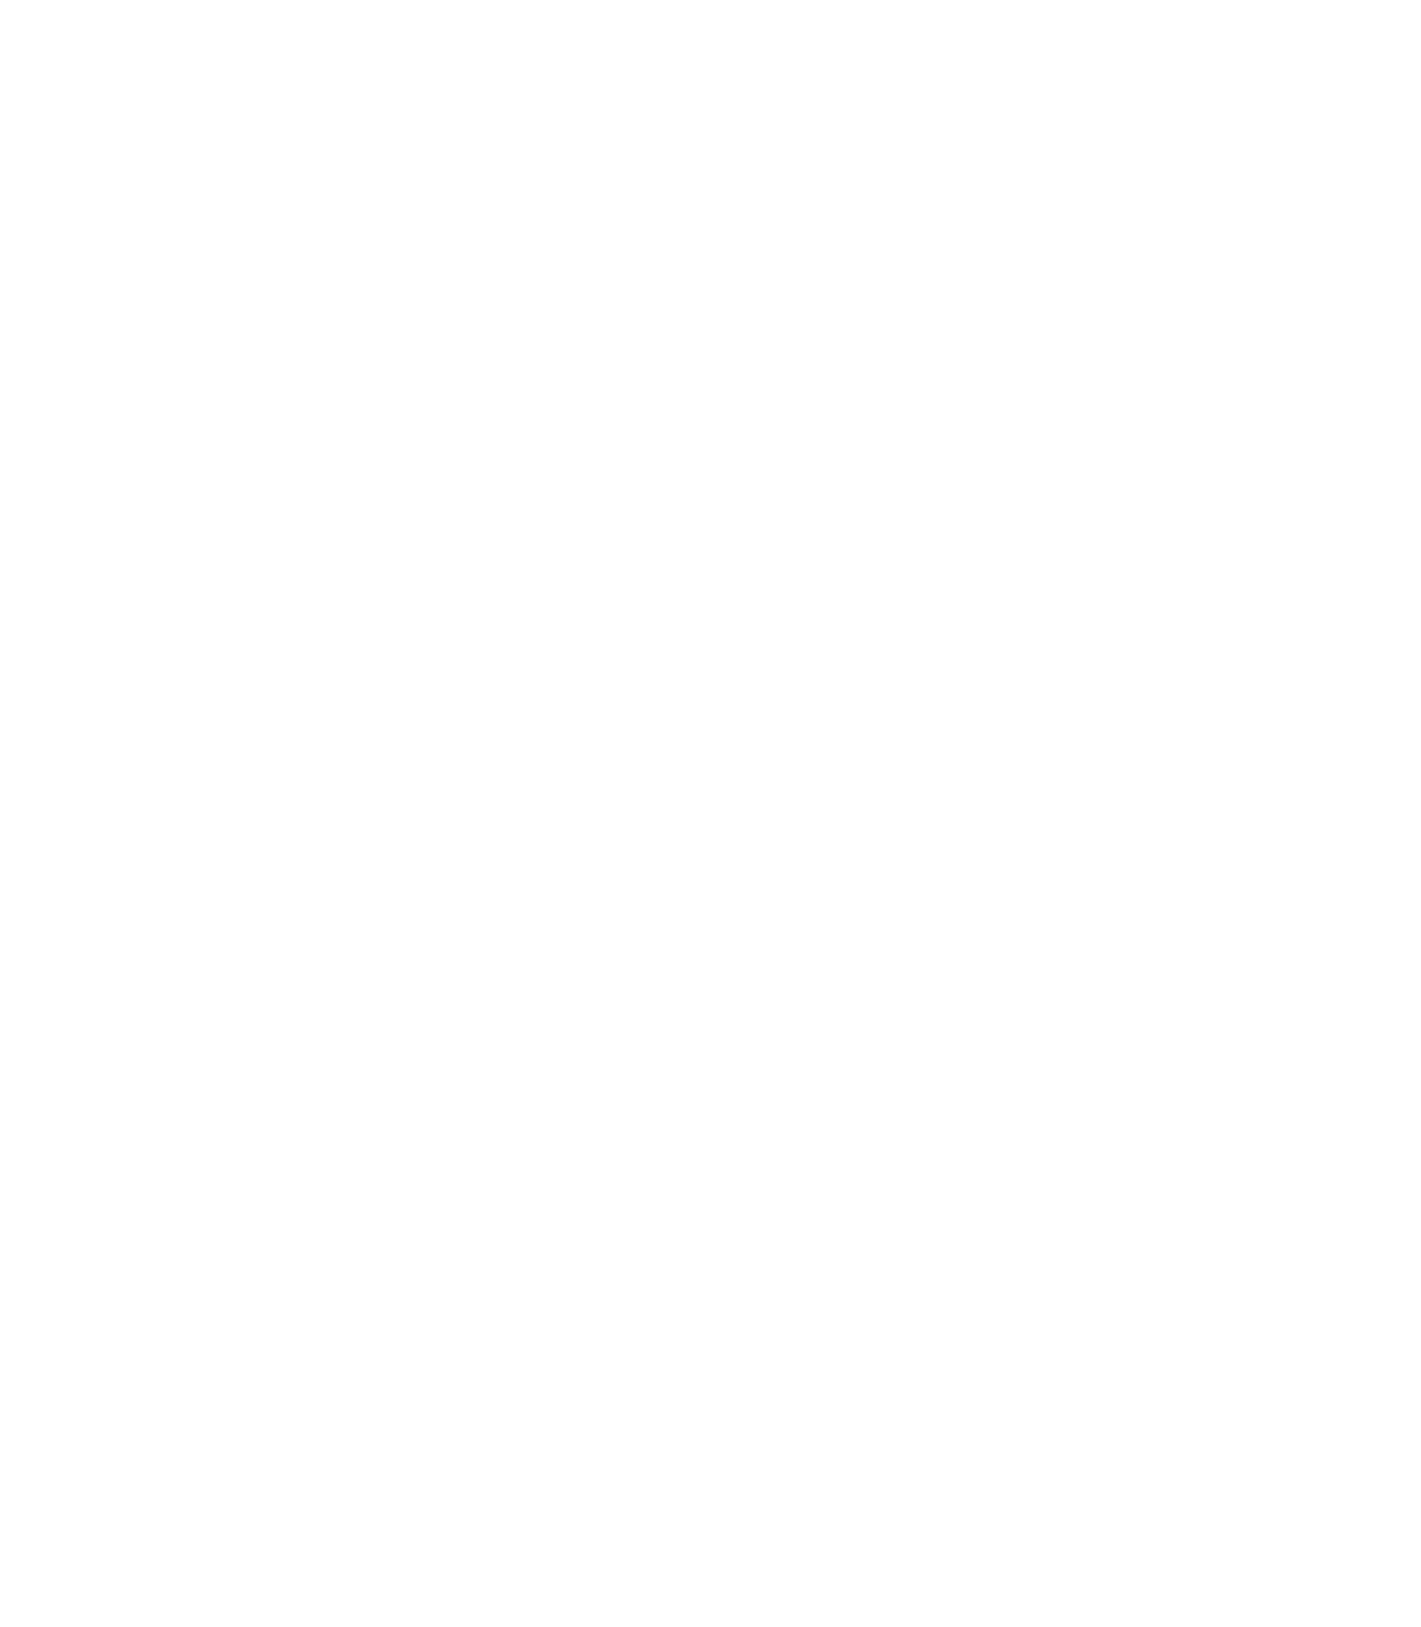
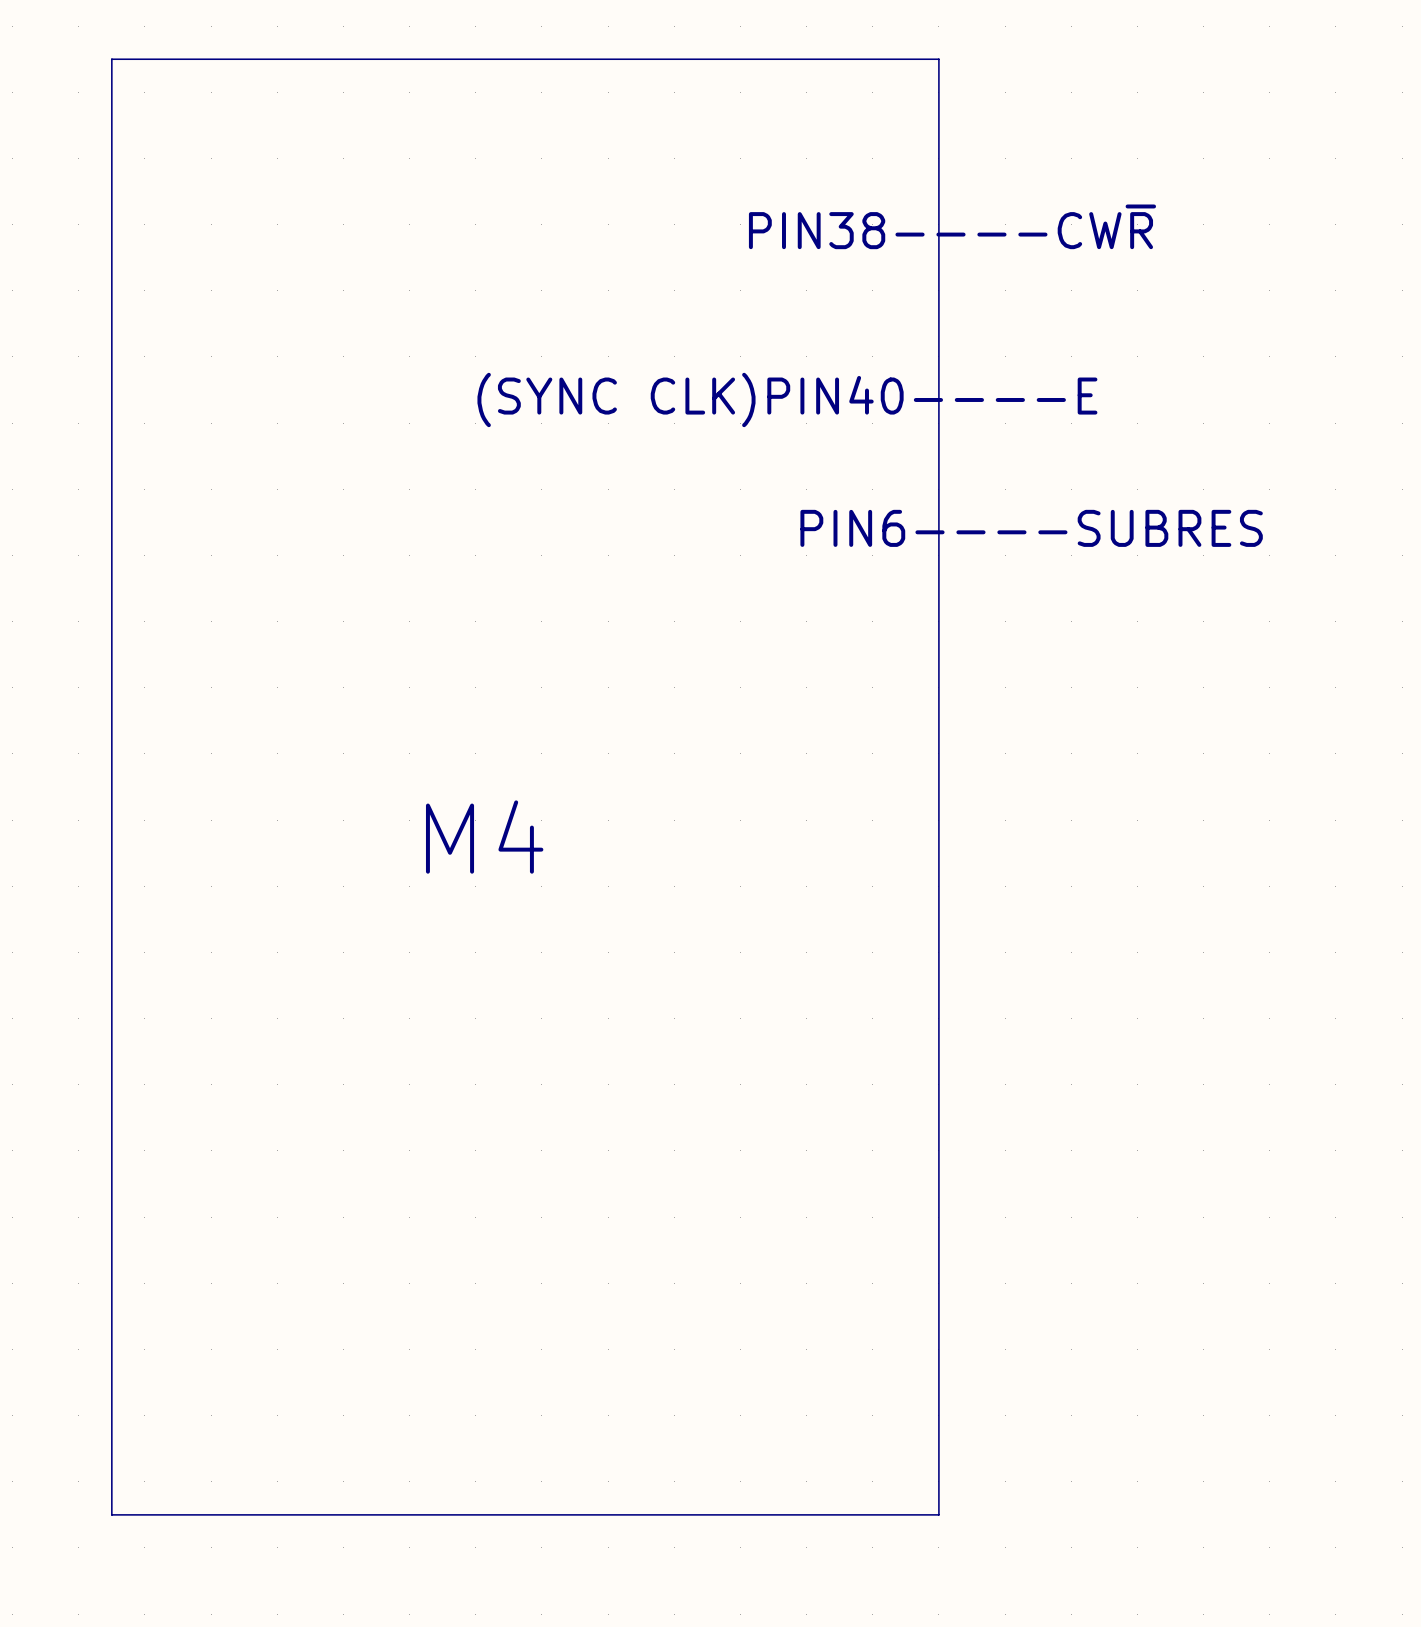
line: none -> (111, 59) (938, 59) (938, 1514) (111, 1514) (111, 59)
text: none -> PIN38----CW~{R} (952, 226)
text: none -> (SYNC CLK)PIN40----E (787, 399)
text: none -> PIN6----SUBRES (1031, 528)
text: none -> M4 (484, 837)

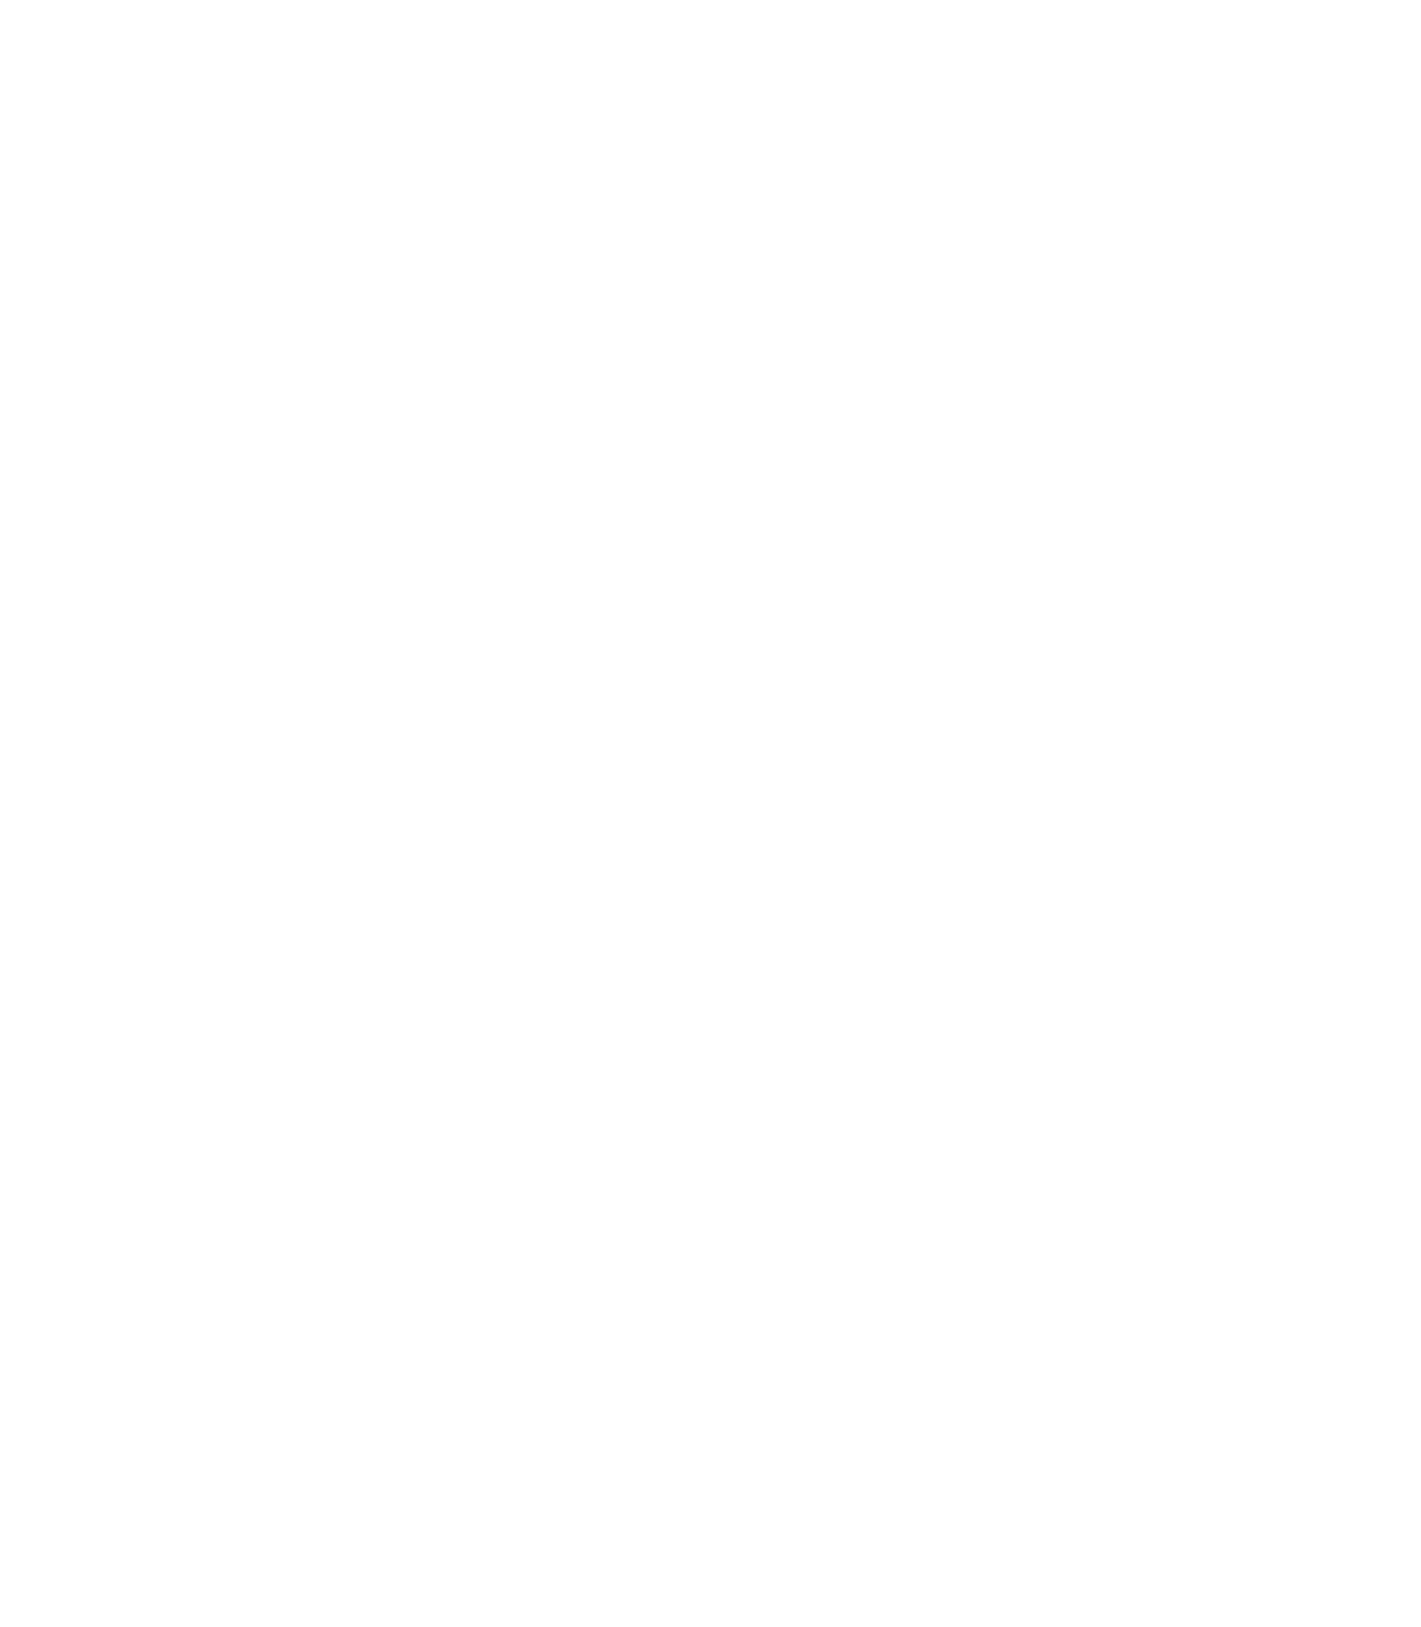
line: (111, 59) (938, 59) (938, 1514) (111, 1514) (111, 59) -> none
text: PIN38----CW~{R} (952, 226) -> none
text: (SYNC CLK)PIN40----E (787, 399) -> none
text: PIN6----SUBRES (1031, 528) -> none
text: M4 (484, 837) -> none

